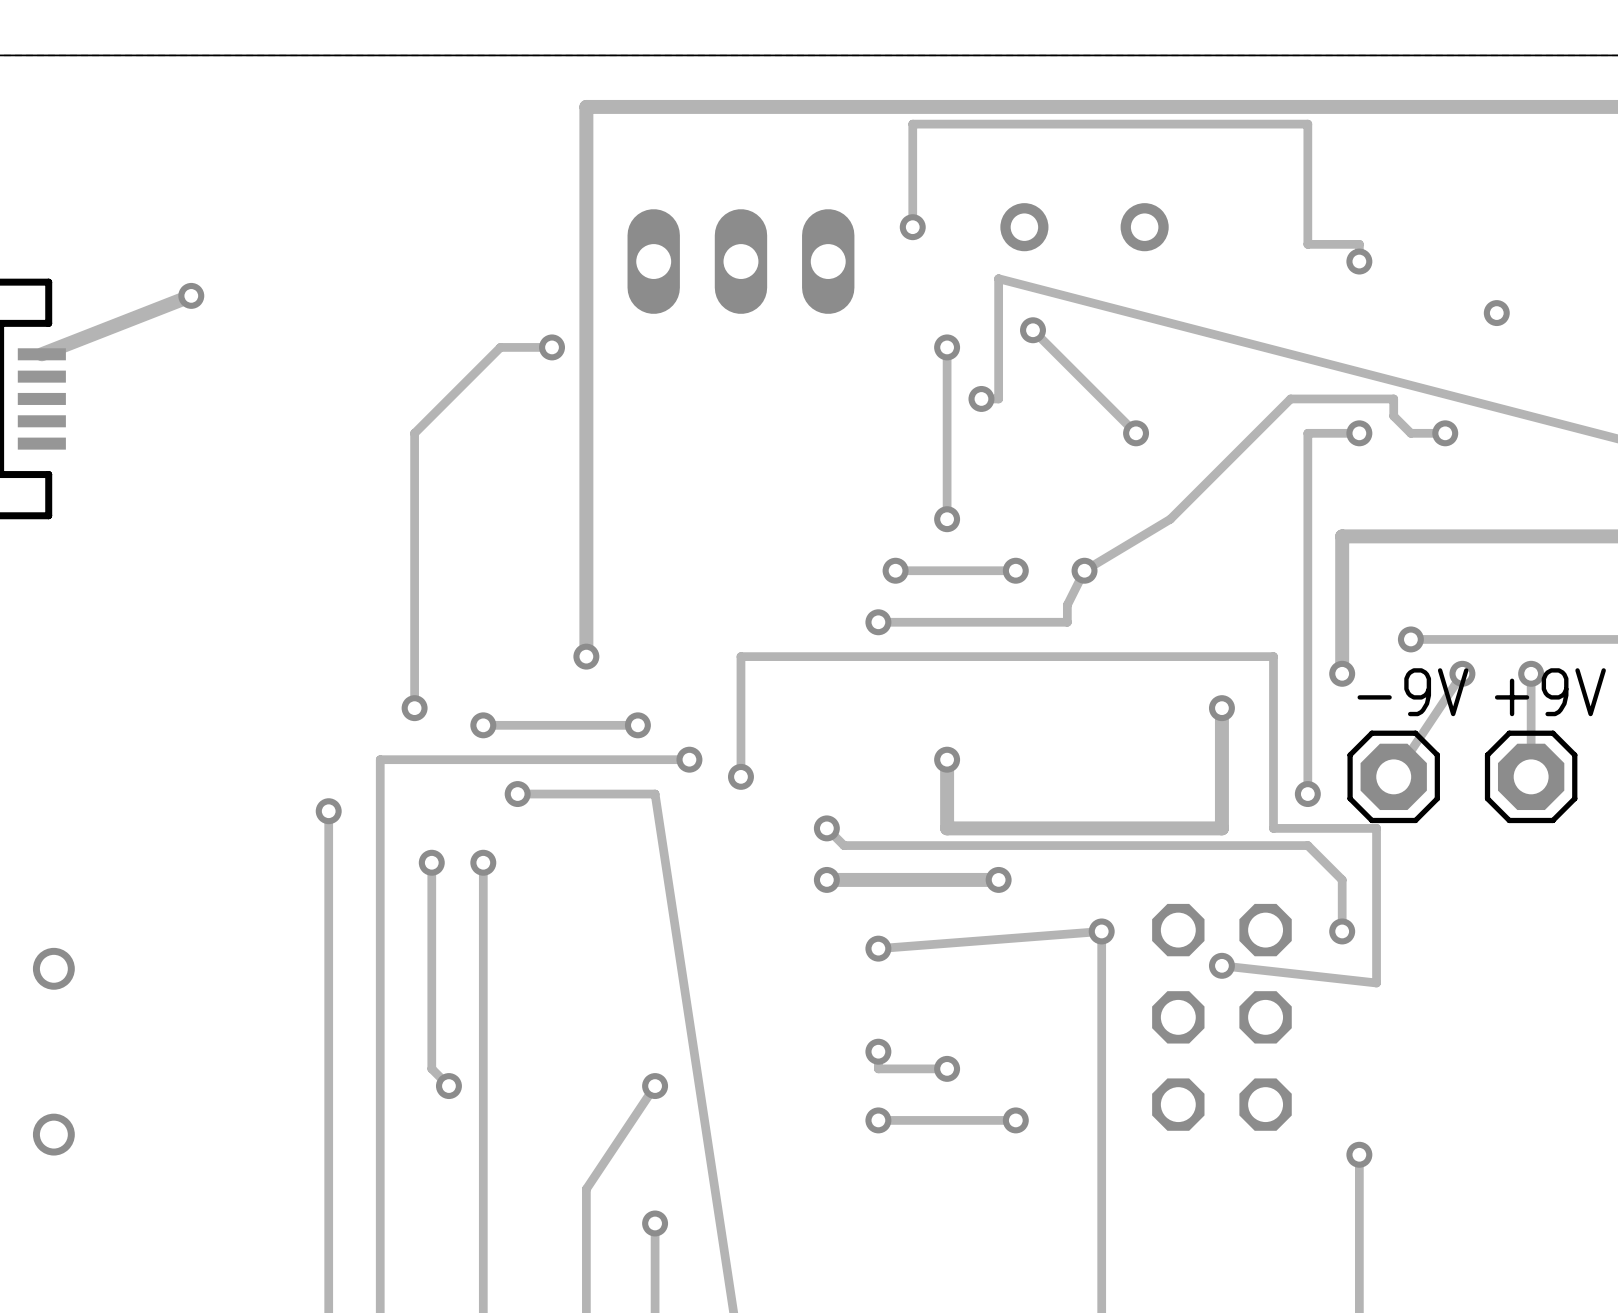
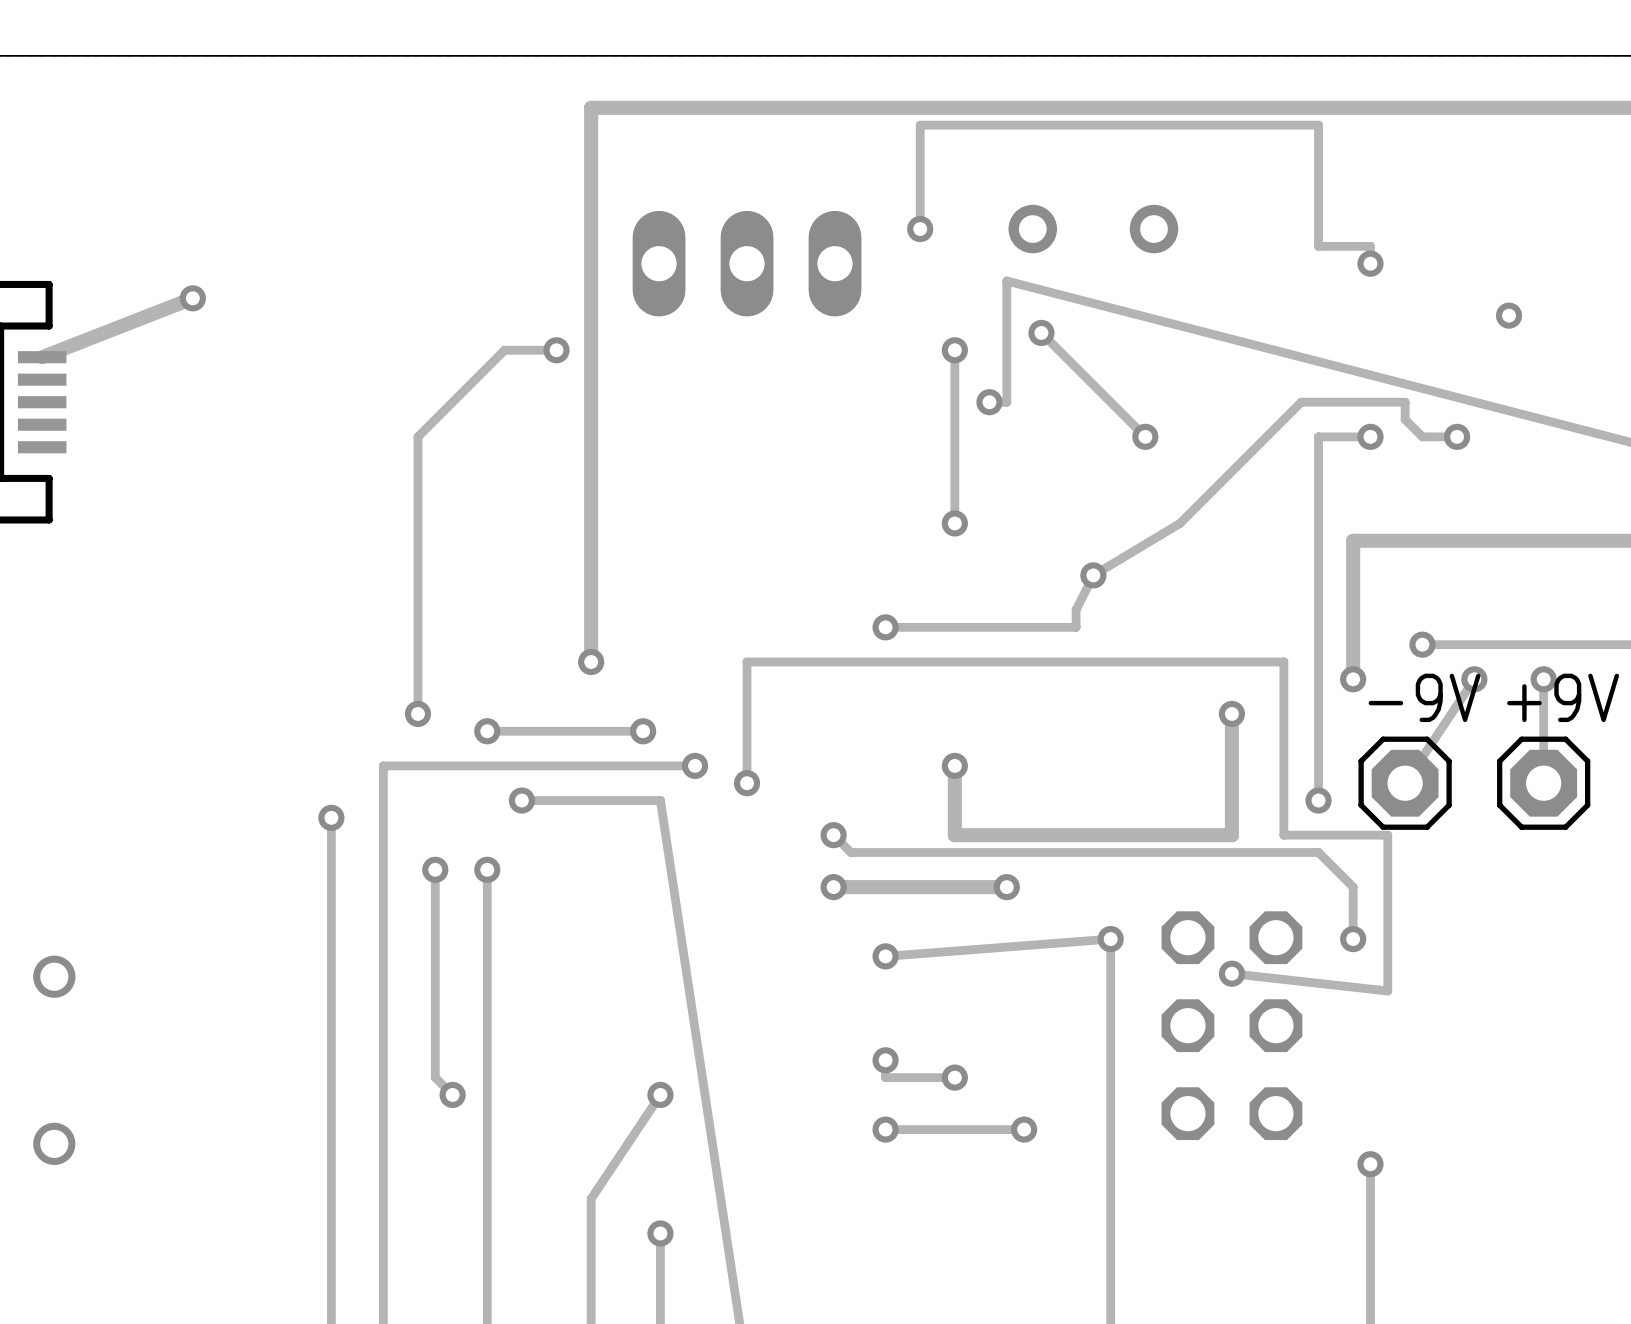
via: (895, 570) -> none
track: (1015, 570) (895, 570) -> none
via: (1015, 570) -> none

